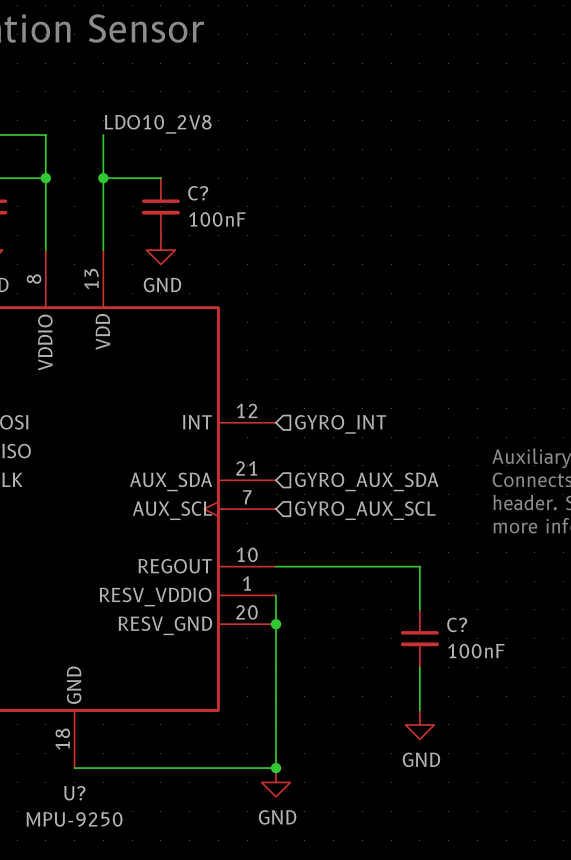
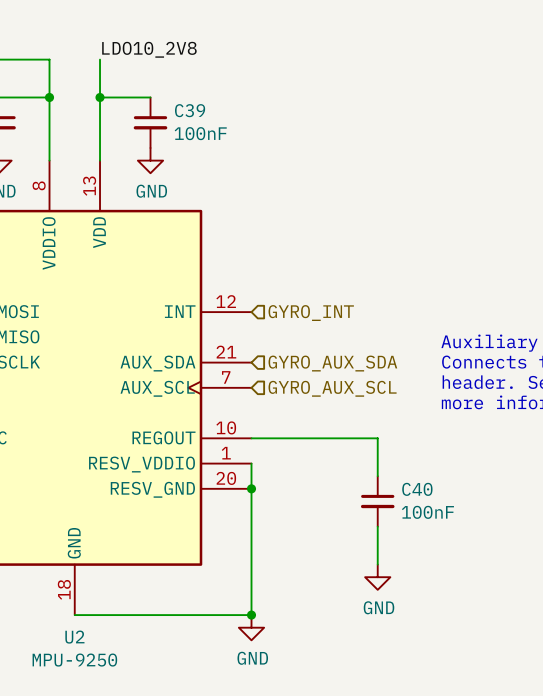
C? name: C? (198, 193) -> C39 (190, 110)
C? name: C? (457, 624) -> C40 (417, 489)
U? name: U? (74, 793) -> U2 (74, 637)

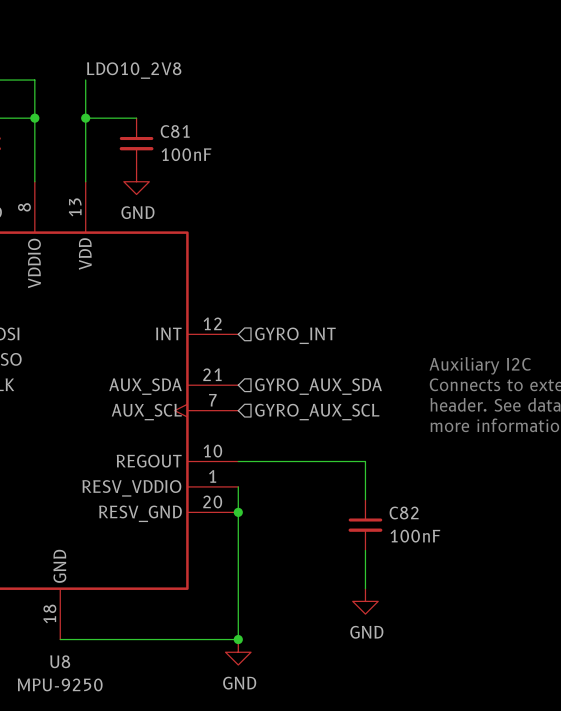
C39 name: C39 (190, 110) -> C81 (175, 131)
C40 name: C40 (417, 489) -> C82 (404, 513)
U2 name: U2 (74, 637) -> U8 (60, 661)

